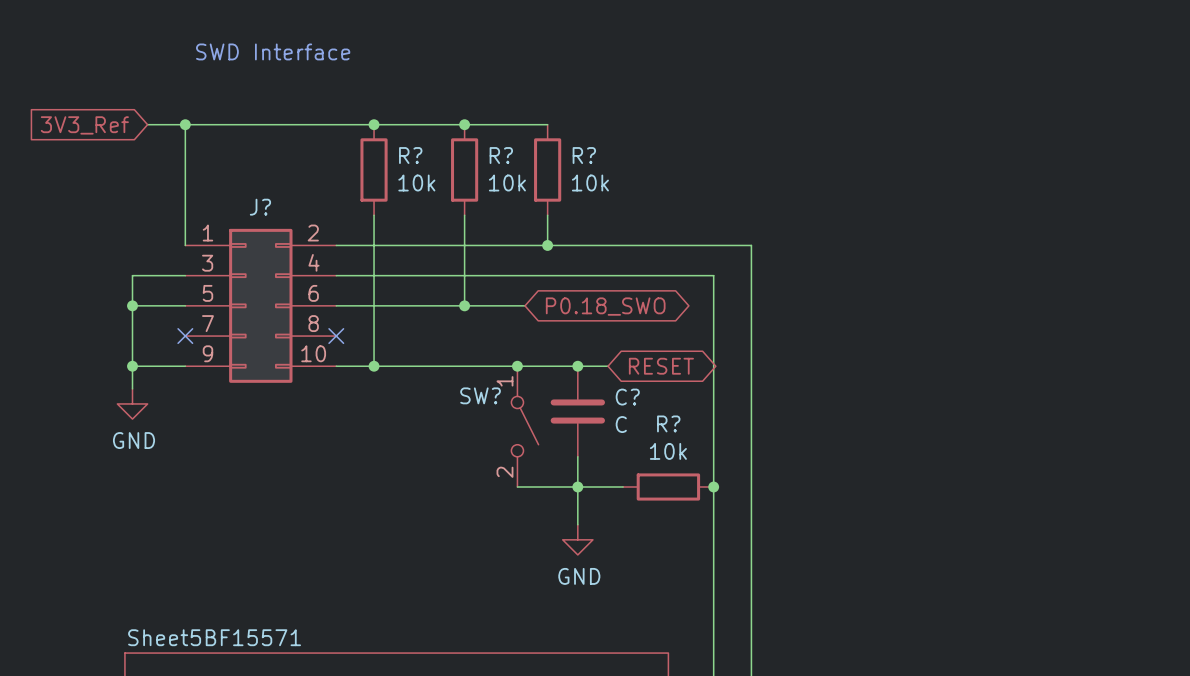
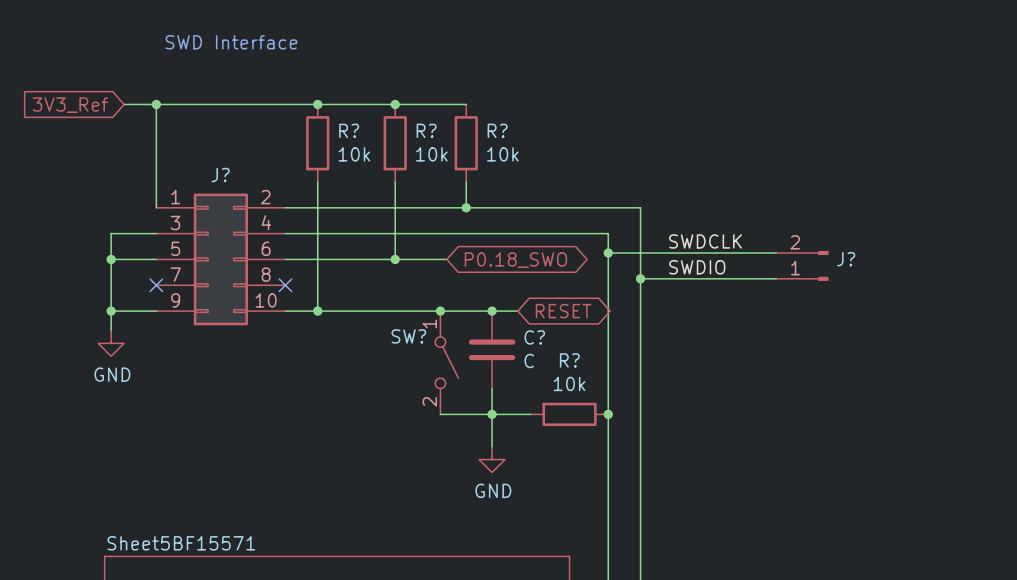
label: none -> SWDCLK (705, 241)
wire: none -> (608, 252) (776, 252)
junction: none -> (608, 252)
J?: none -> (802, 265)
label: none -> SWDIO (697, 267)
wire: none -> (640, 278) (776, 278)
junction: none -> (640, 278)

